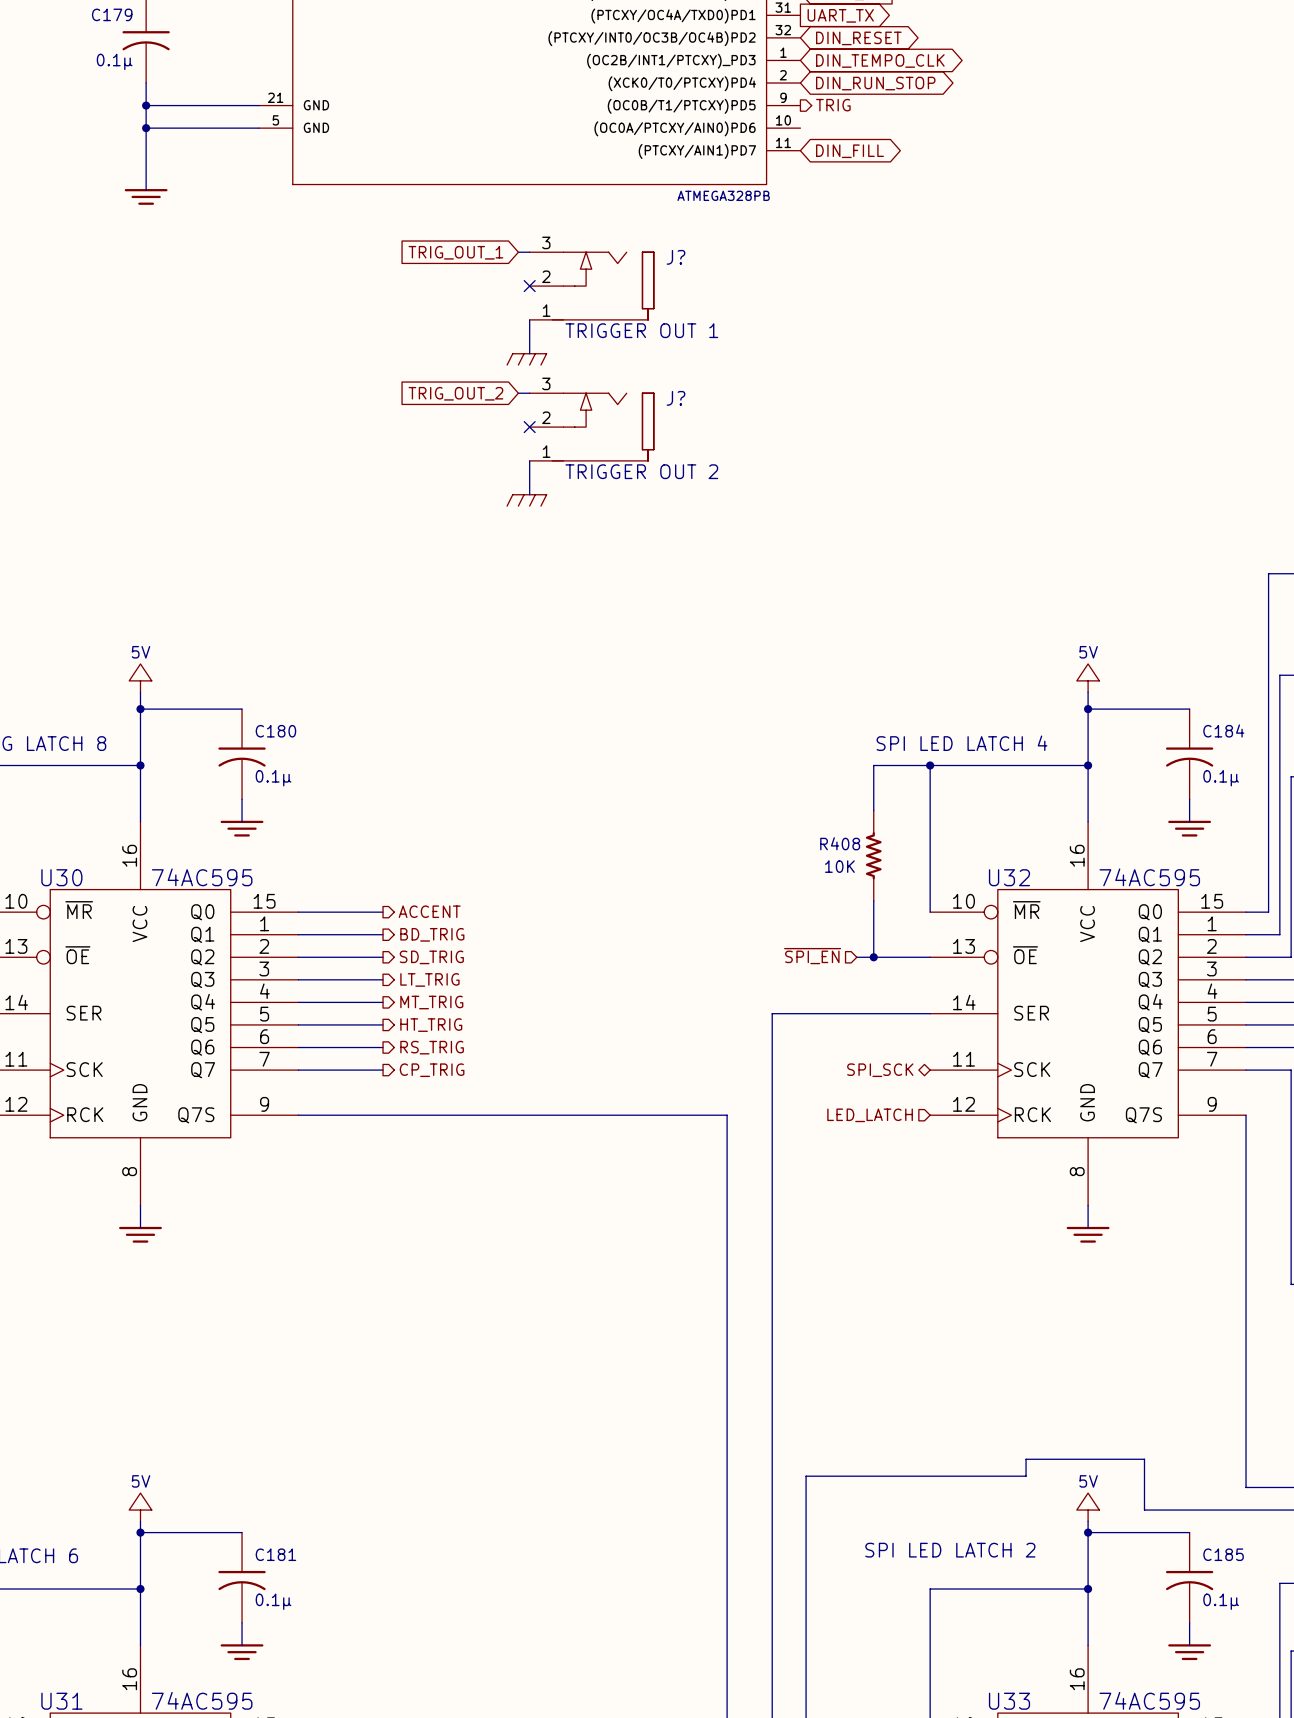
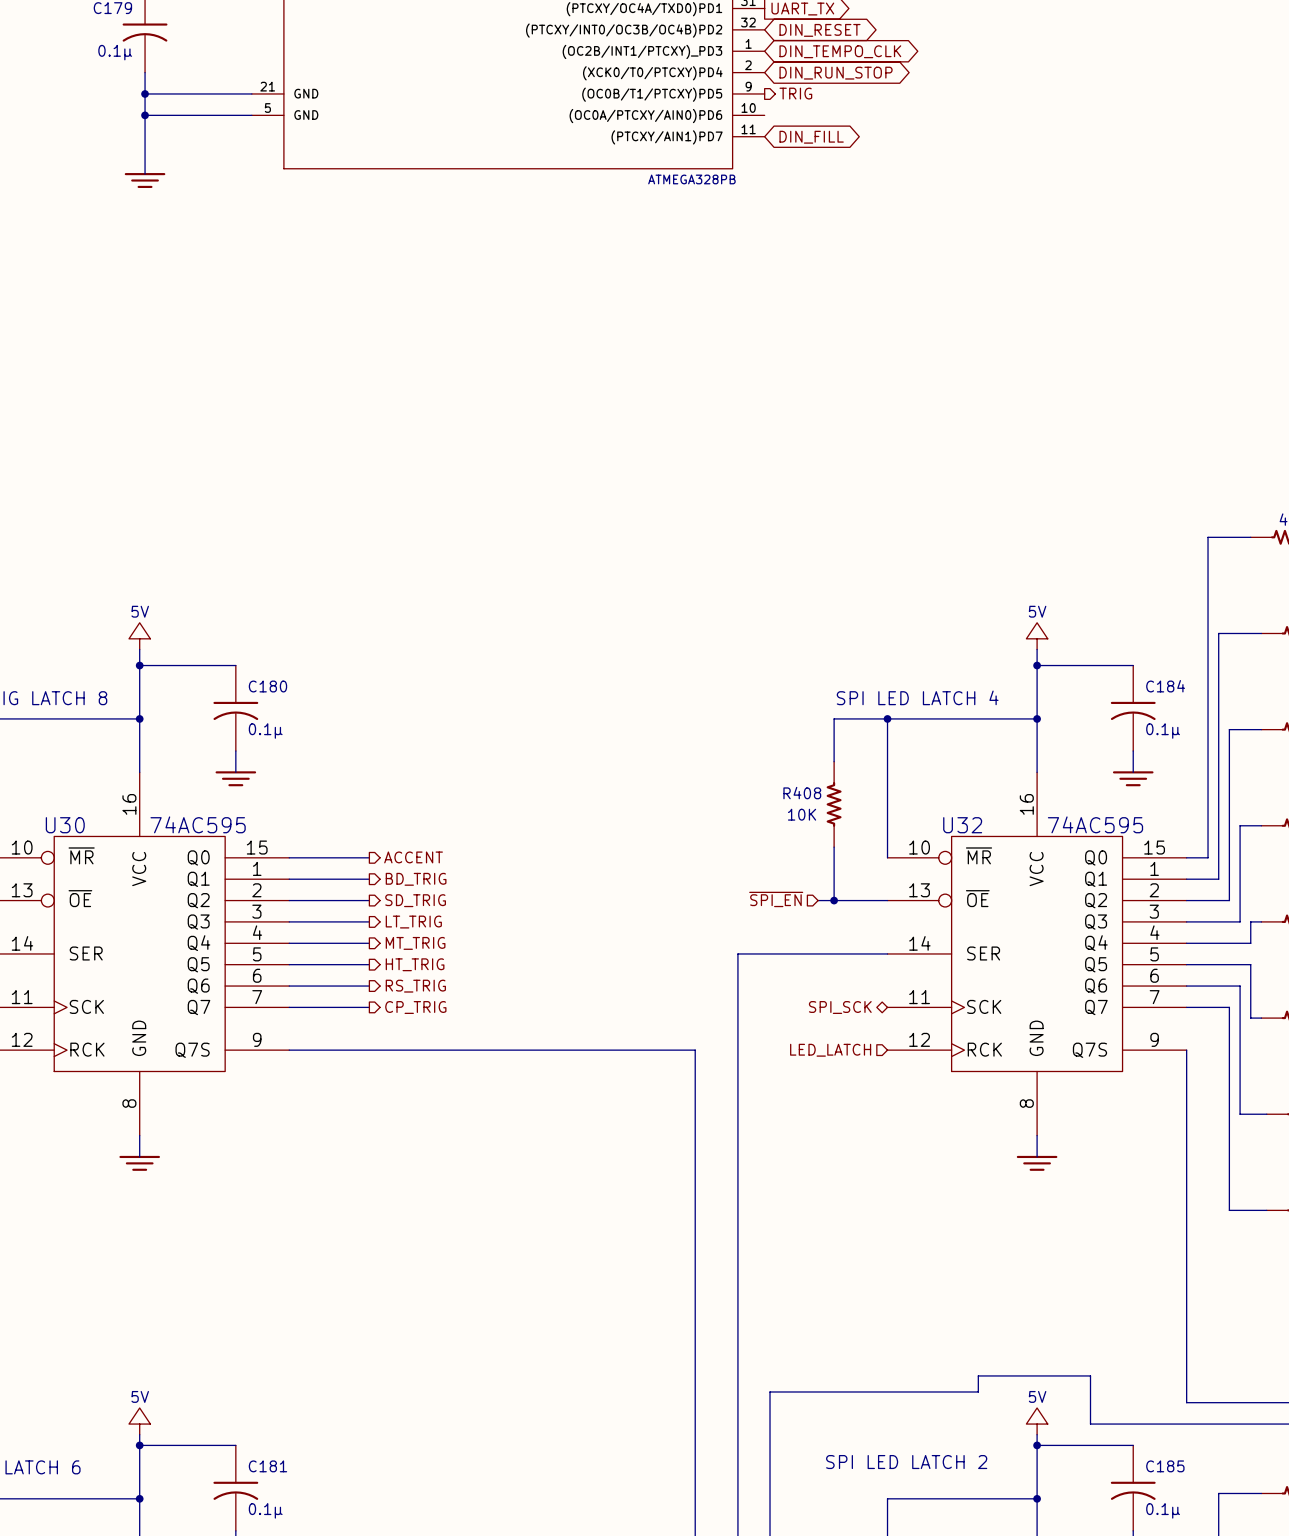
global label: TRIG_OUT_1 (455, 252) -> none
wire: (518, 252) (529, 252) -> none
no-connect mark: (529, 286) -> none
J?: TRIGGER OUT 1 (591, 286) -> none
wire: (529, 319) (529, 353) -> none
power symbol: (526, 359) -> none
global label: TRIG_OUT_2 (455, 393) -> none
wire: (518, 393) (529, 393) -> none
no-connect mark: (529, 427) -> none
J?: TRIGGER OUT 2 (591, 427) -> none
wire: (529, 460) (529, 494) -> none
power symbol: (526, 500) -> none

